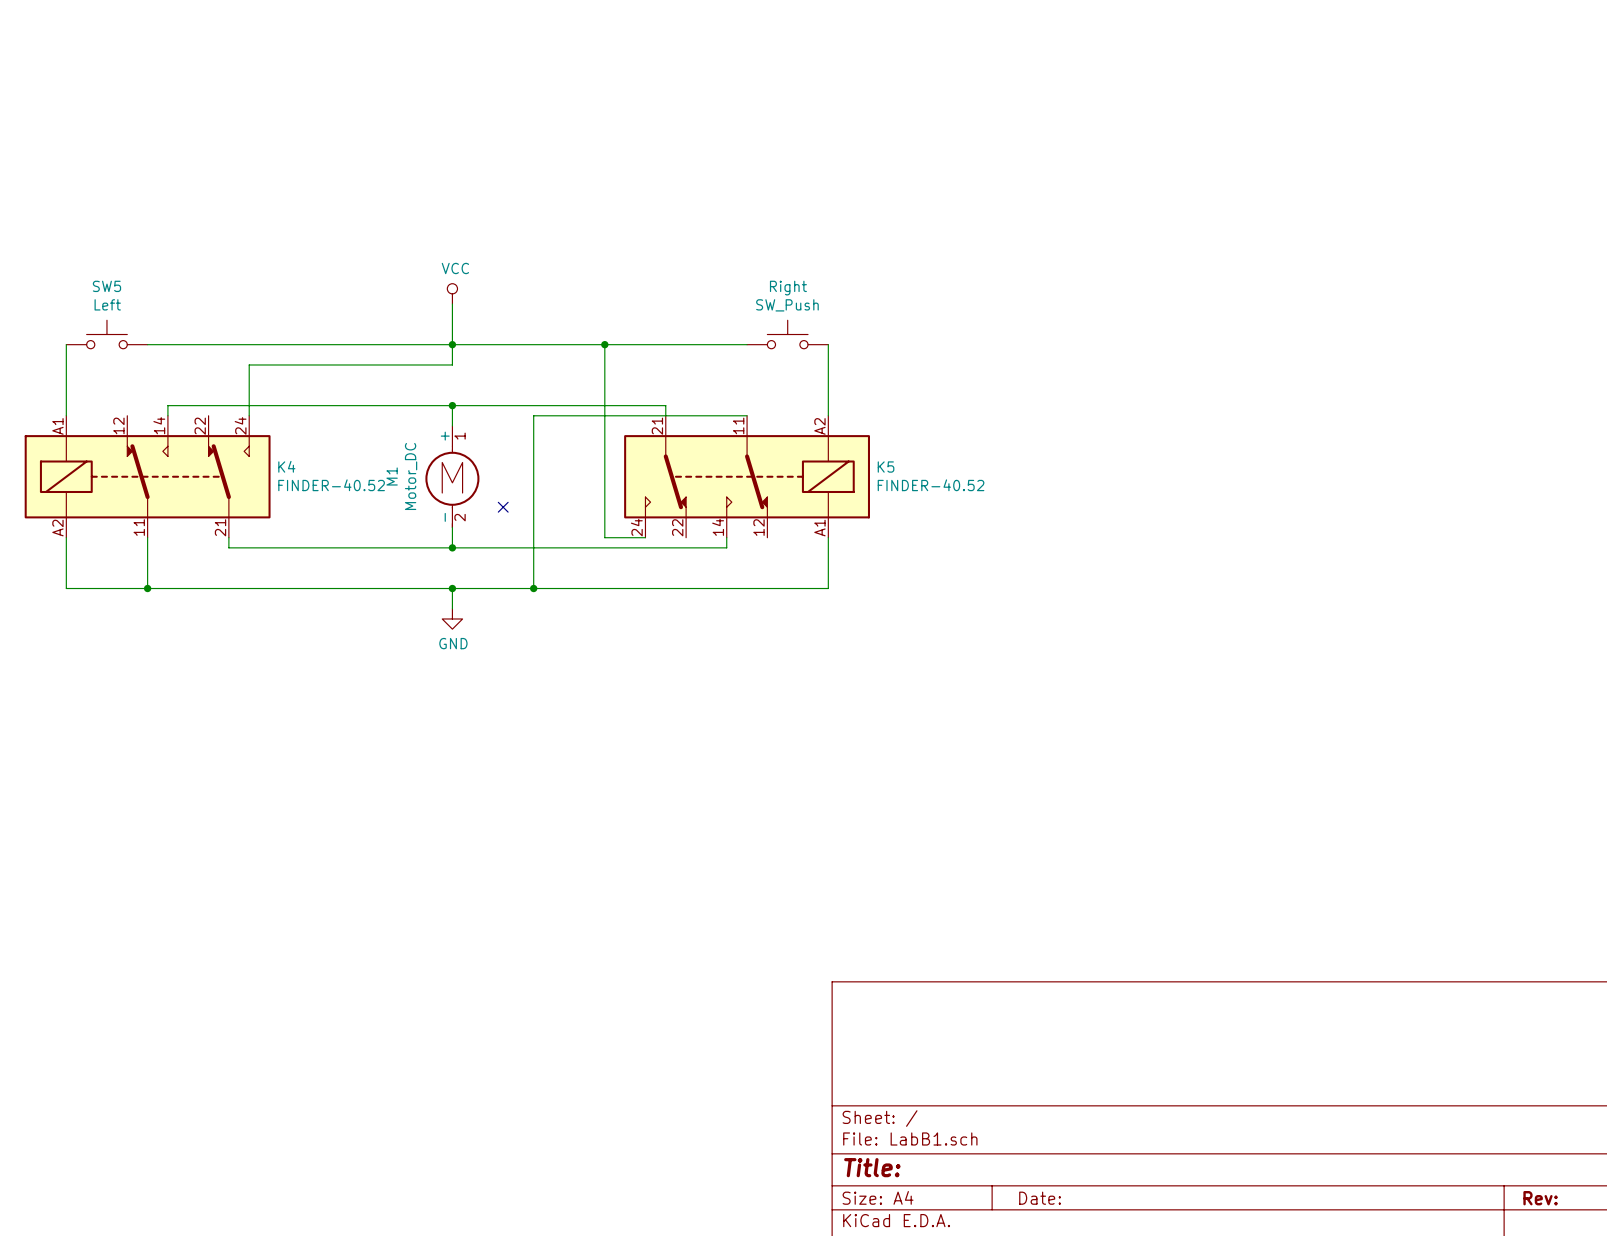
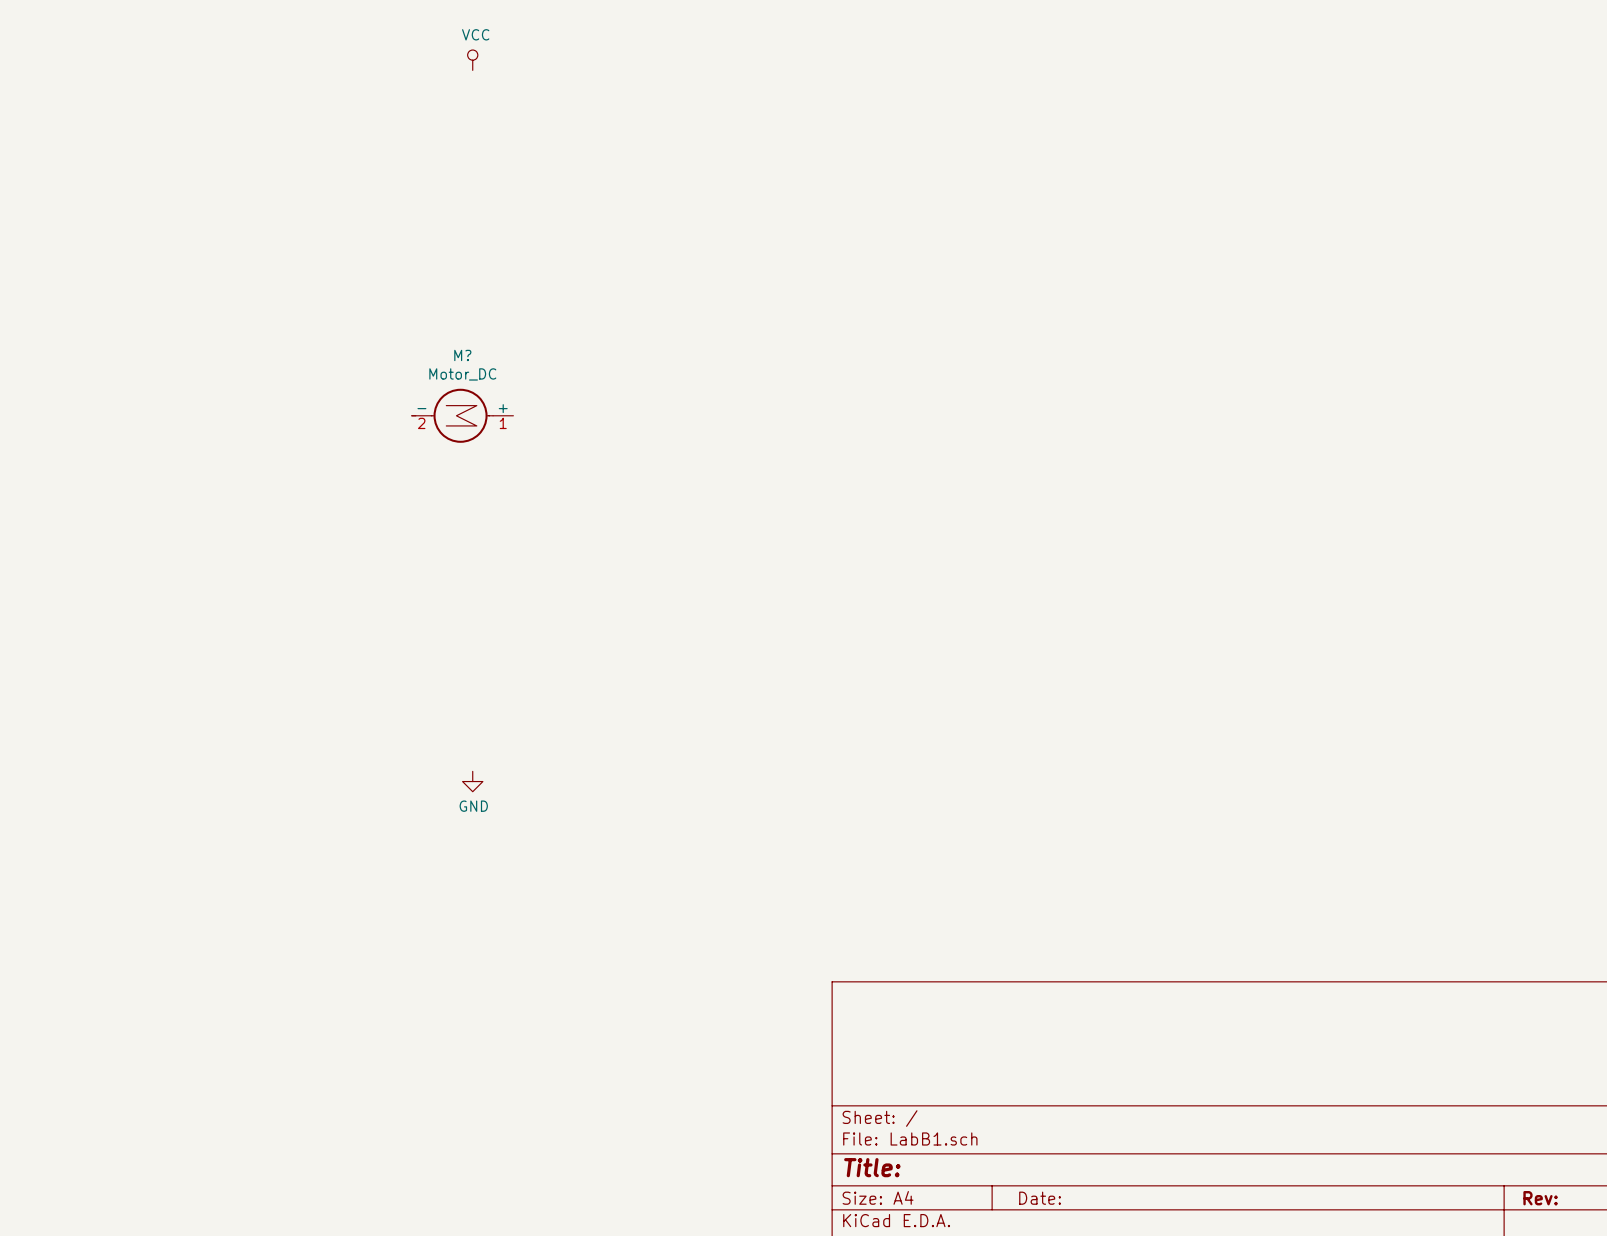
power symbol: none -> VCC (472, 60)
power symbol: VCC (452, 293) -> none
wire: (452, 304) (452, 364) (249, 364) (249, 415) -> none
SW5: Left (106, 334) -> none
Right: SW_Push (787, 334) -> none
wire: (66, 344) (66, 415) -> none
wire: (147, 344) (747, 344) -> none
junction: (452, 344) -> none
wire: (604, 344) (604, 537) (645, 537) -> none
junction: (604, 344) -> none
wire: (828, 344) (828, 415) -> none
wire: (452, 405) (452, 425) -> none
junction: (452, 405) -> none
wire: (167, 415) (167, 405) (665, 405) (665, 415) -> none
M?: none -> Motor_DC (462, 415)
wire: (747, 415) (533, 415) (533, 588) -> none
K4: FINDER-40.52 (147, 476) -> none
M1: Motor_DC (452, 476) -> none
K5: FINDER-40.52 (747, 476) -> none
no-connect mark: (503, 507) -> none
wire: (452, 527) (452, 547) -> none
wire: (66, 537) (66, 588) (828, 588) (828, 537) -> none
wire: (147, 537) (147, 588) -> none
wire: (228, 537) (228, 547) (726, 547) (726, 537) -> none
junction: (452, 547) -> none
junction: (147, 588) -> none
wire: (452, 588) (452, 608) -> none
junction: (452, 588) -> none
junction: (533, 588) -> none
power symbol position: GND (452, 618) -> GND (472, 781)

